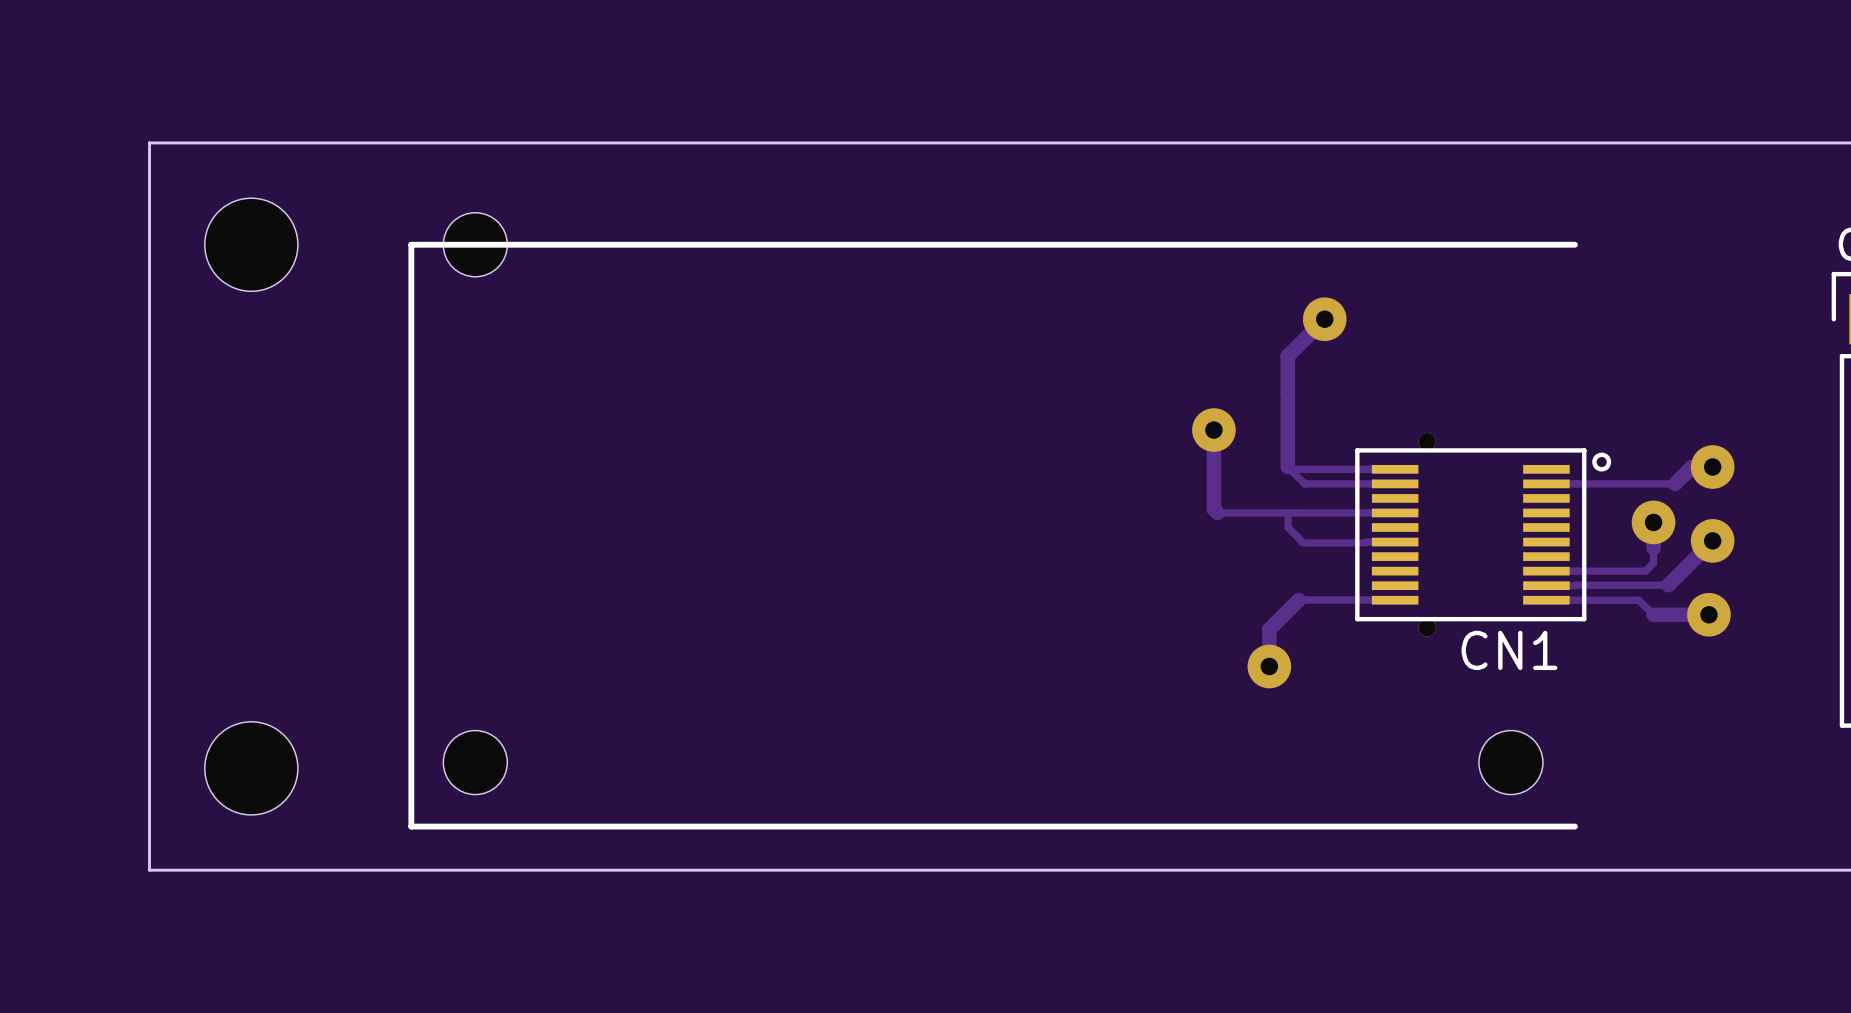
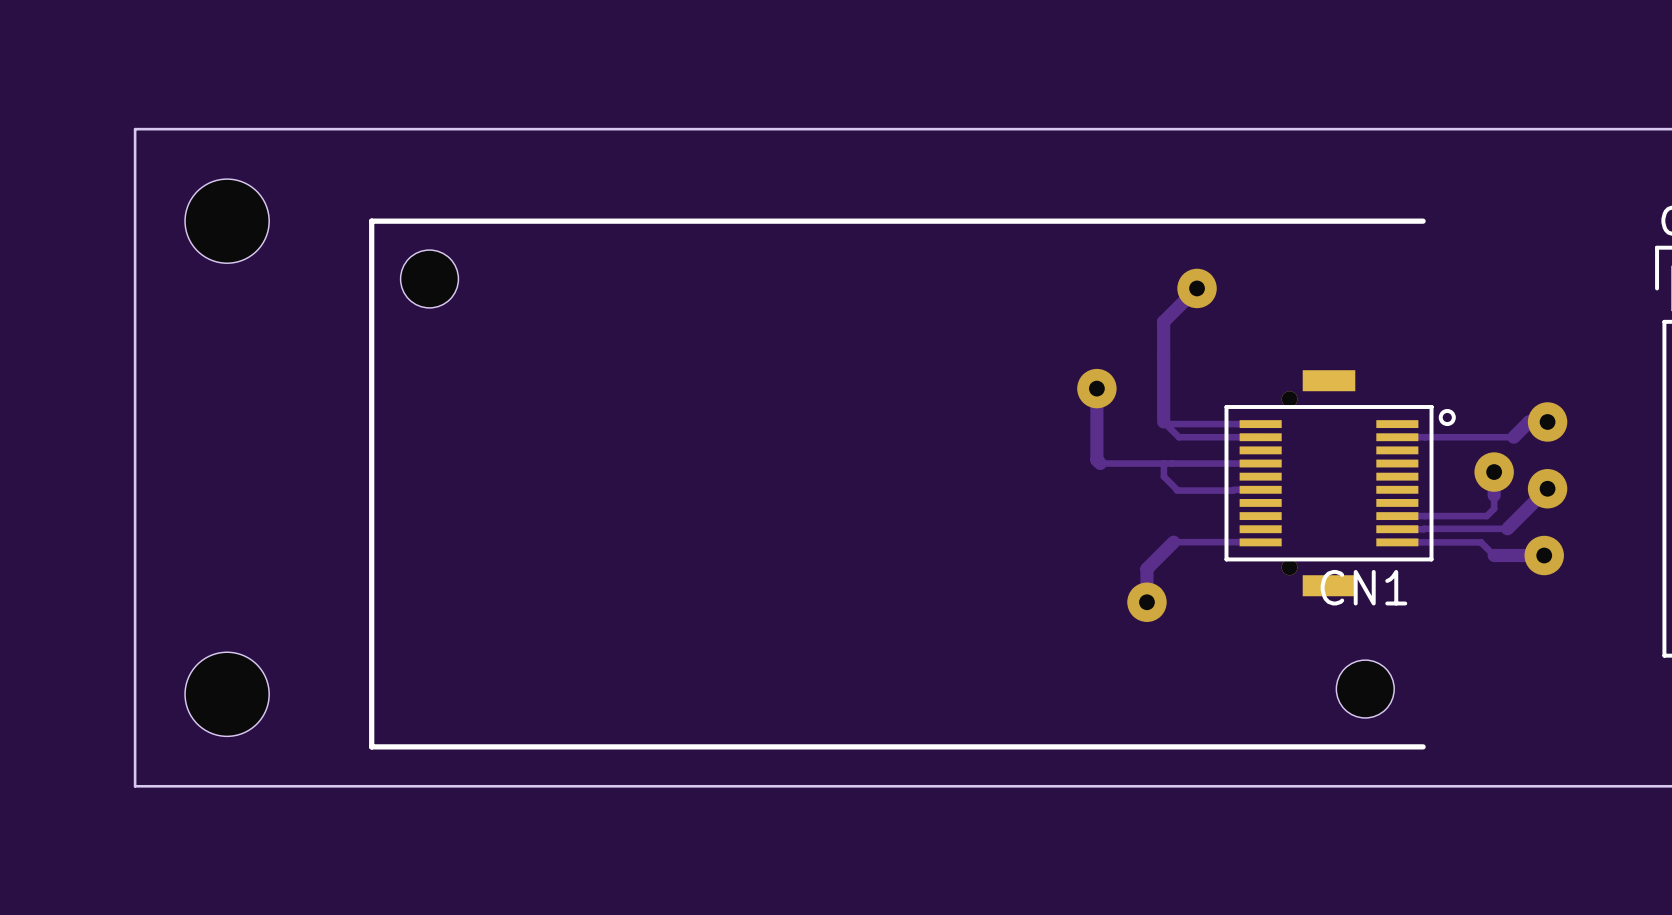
part position: (475, 244) -> (429, 278)
CN1 footprint: [1355, 432, 1612, 637] -> [1224, 370, 1456, 597]
part: (475, 762) -> none

